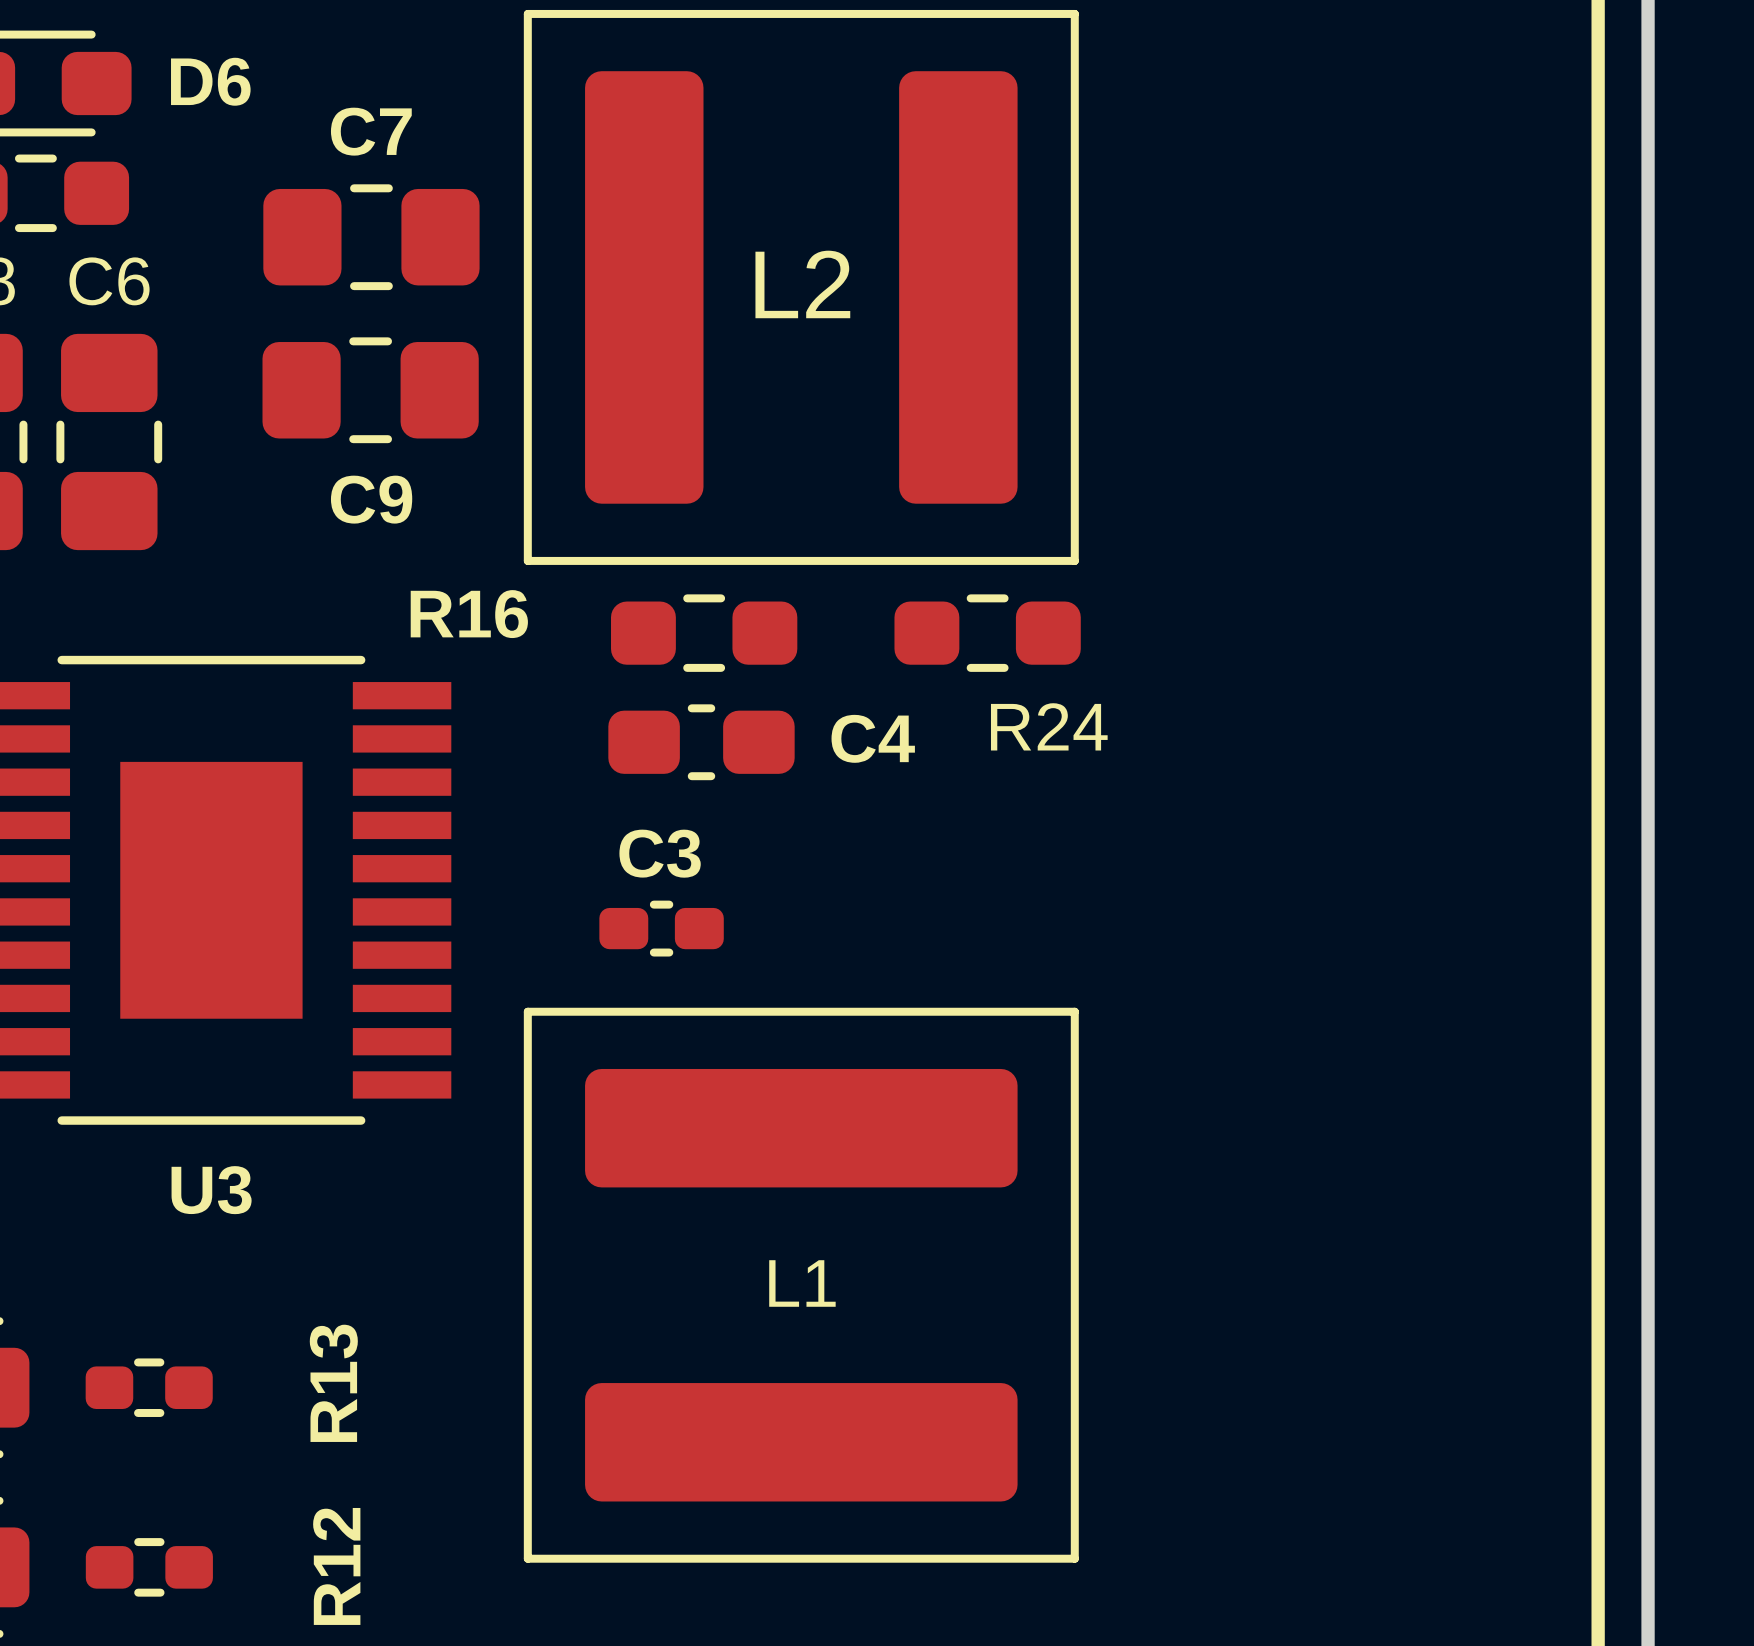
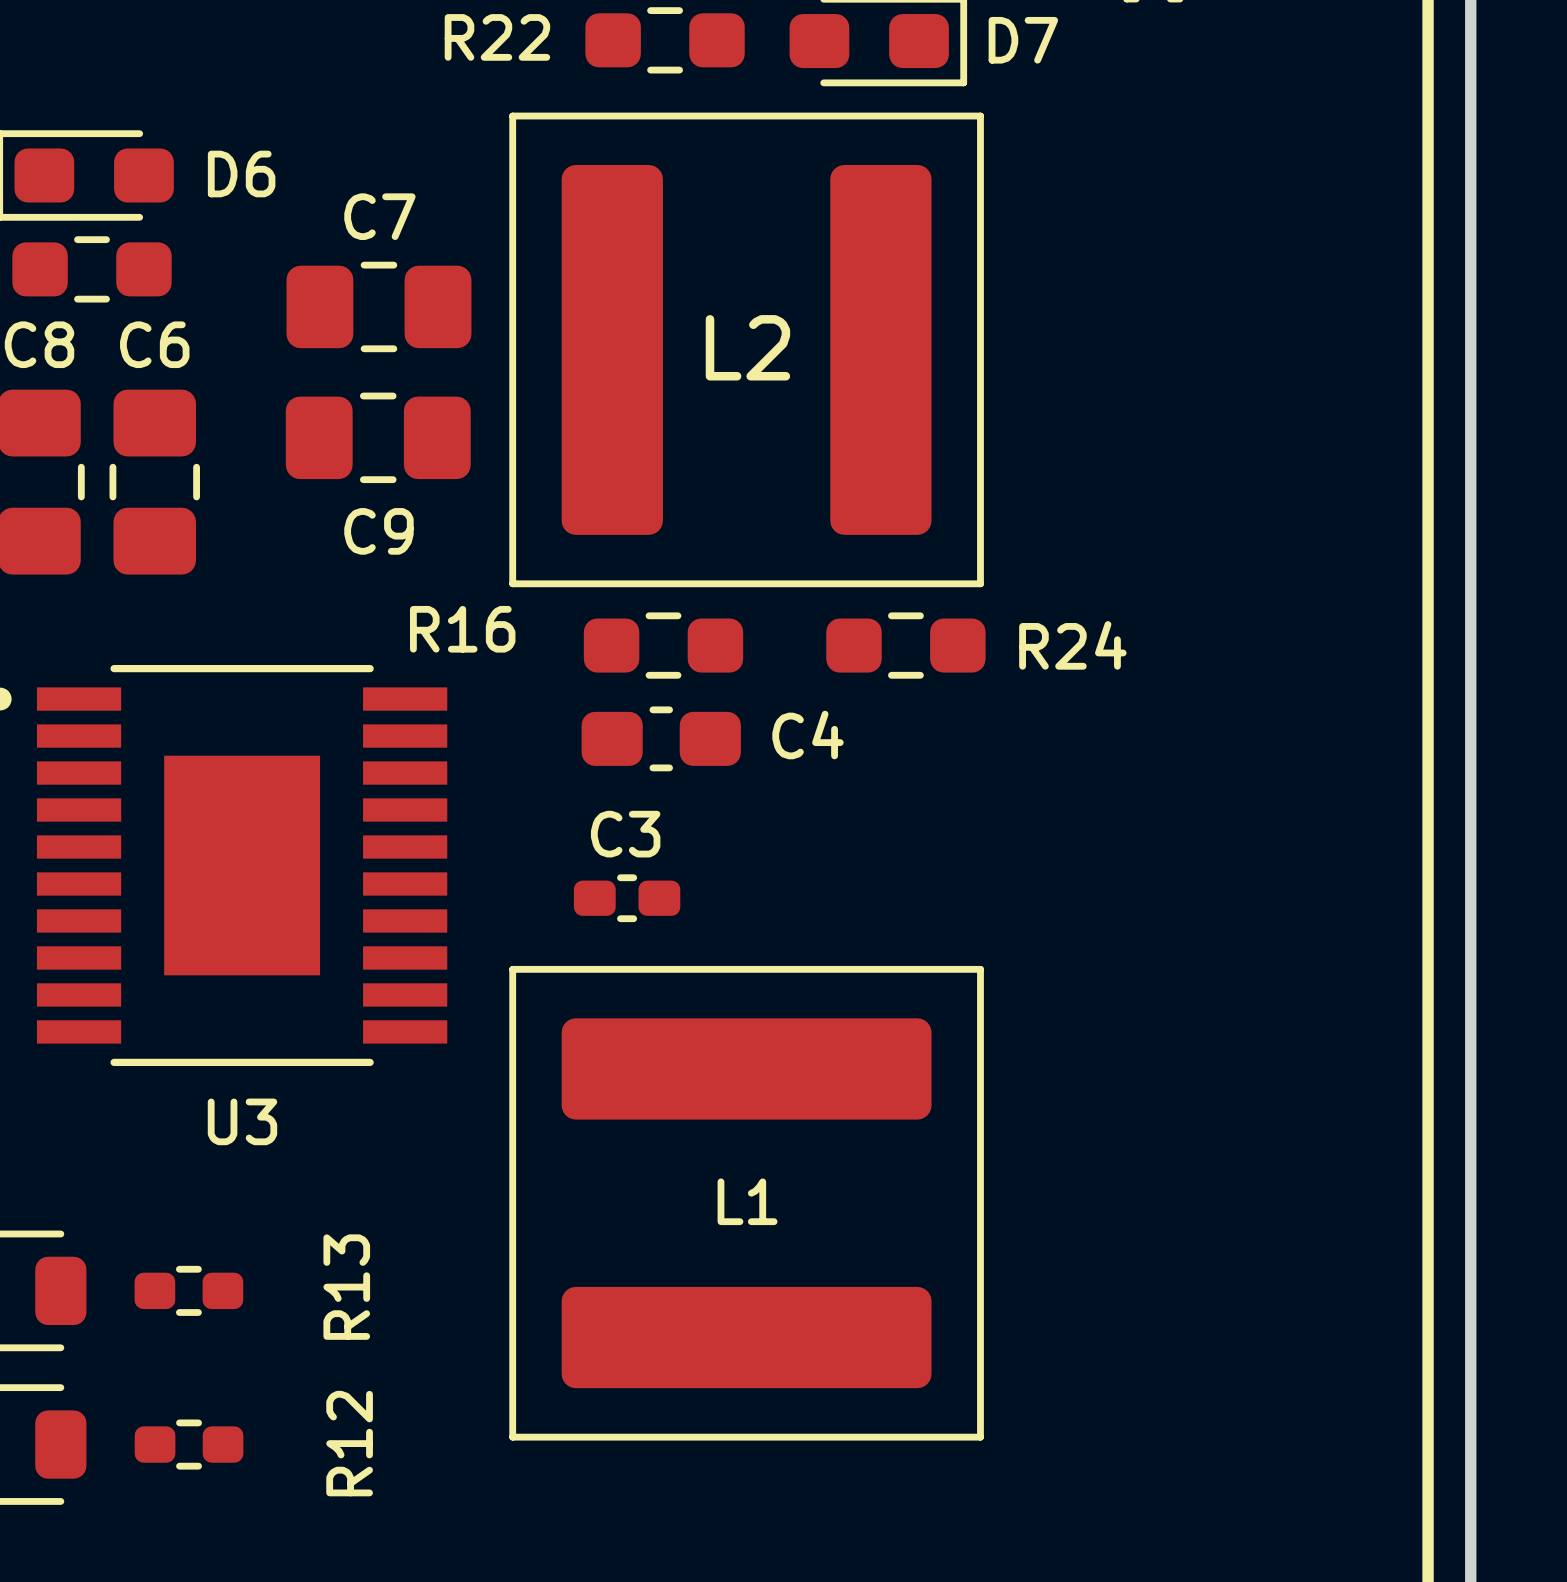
R24 name position: R24 (1049, 726) -> R24 (1072, 645)

